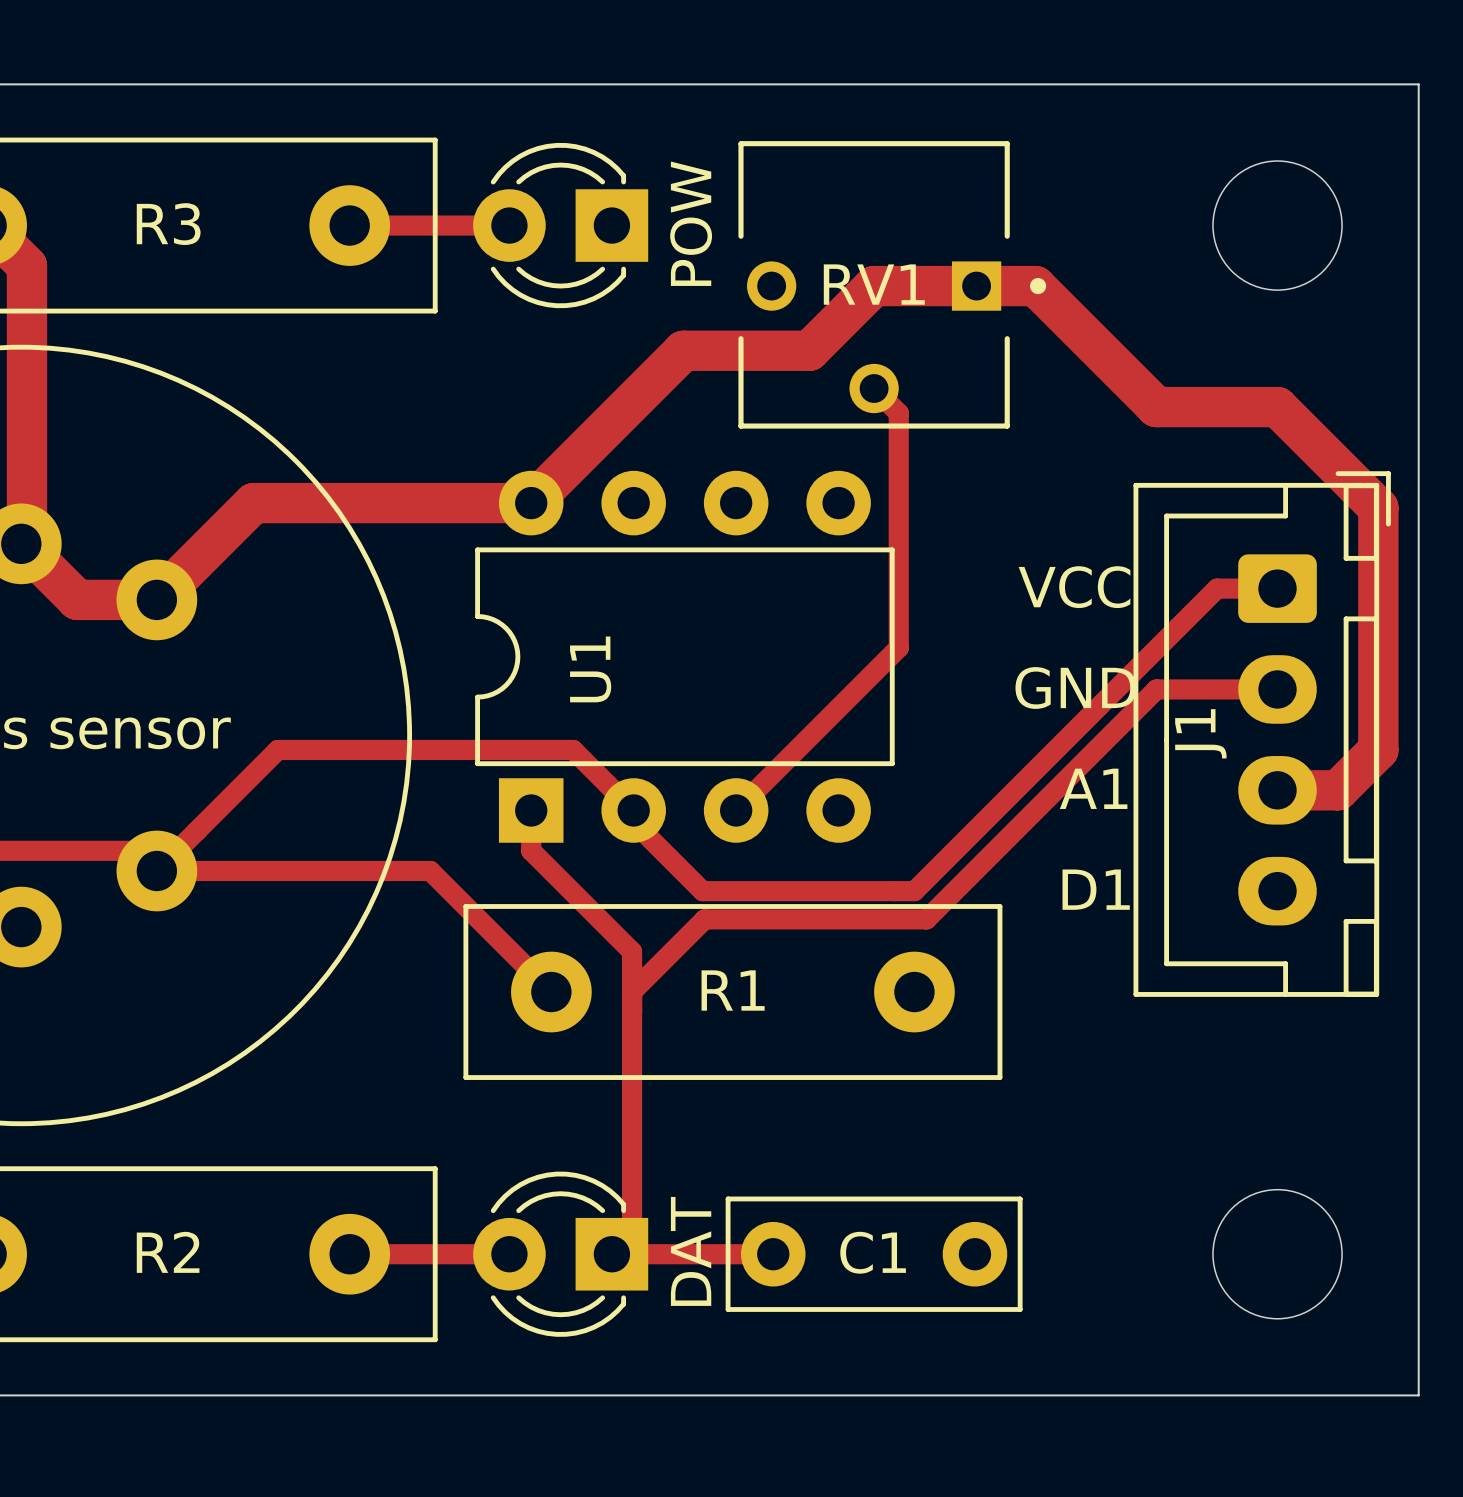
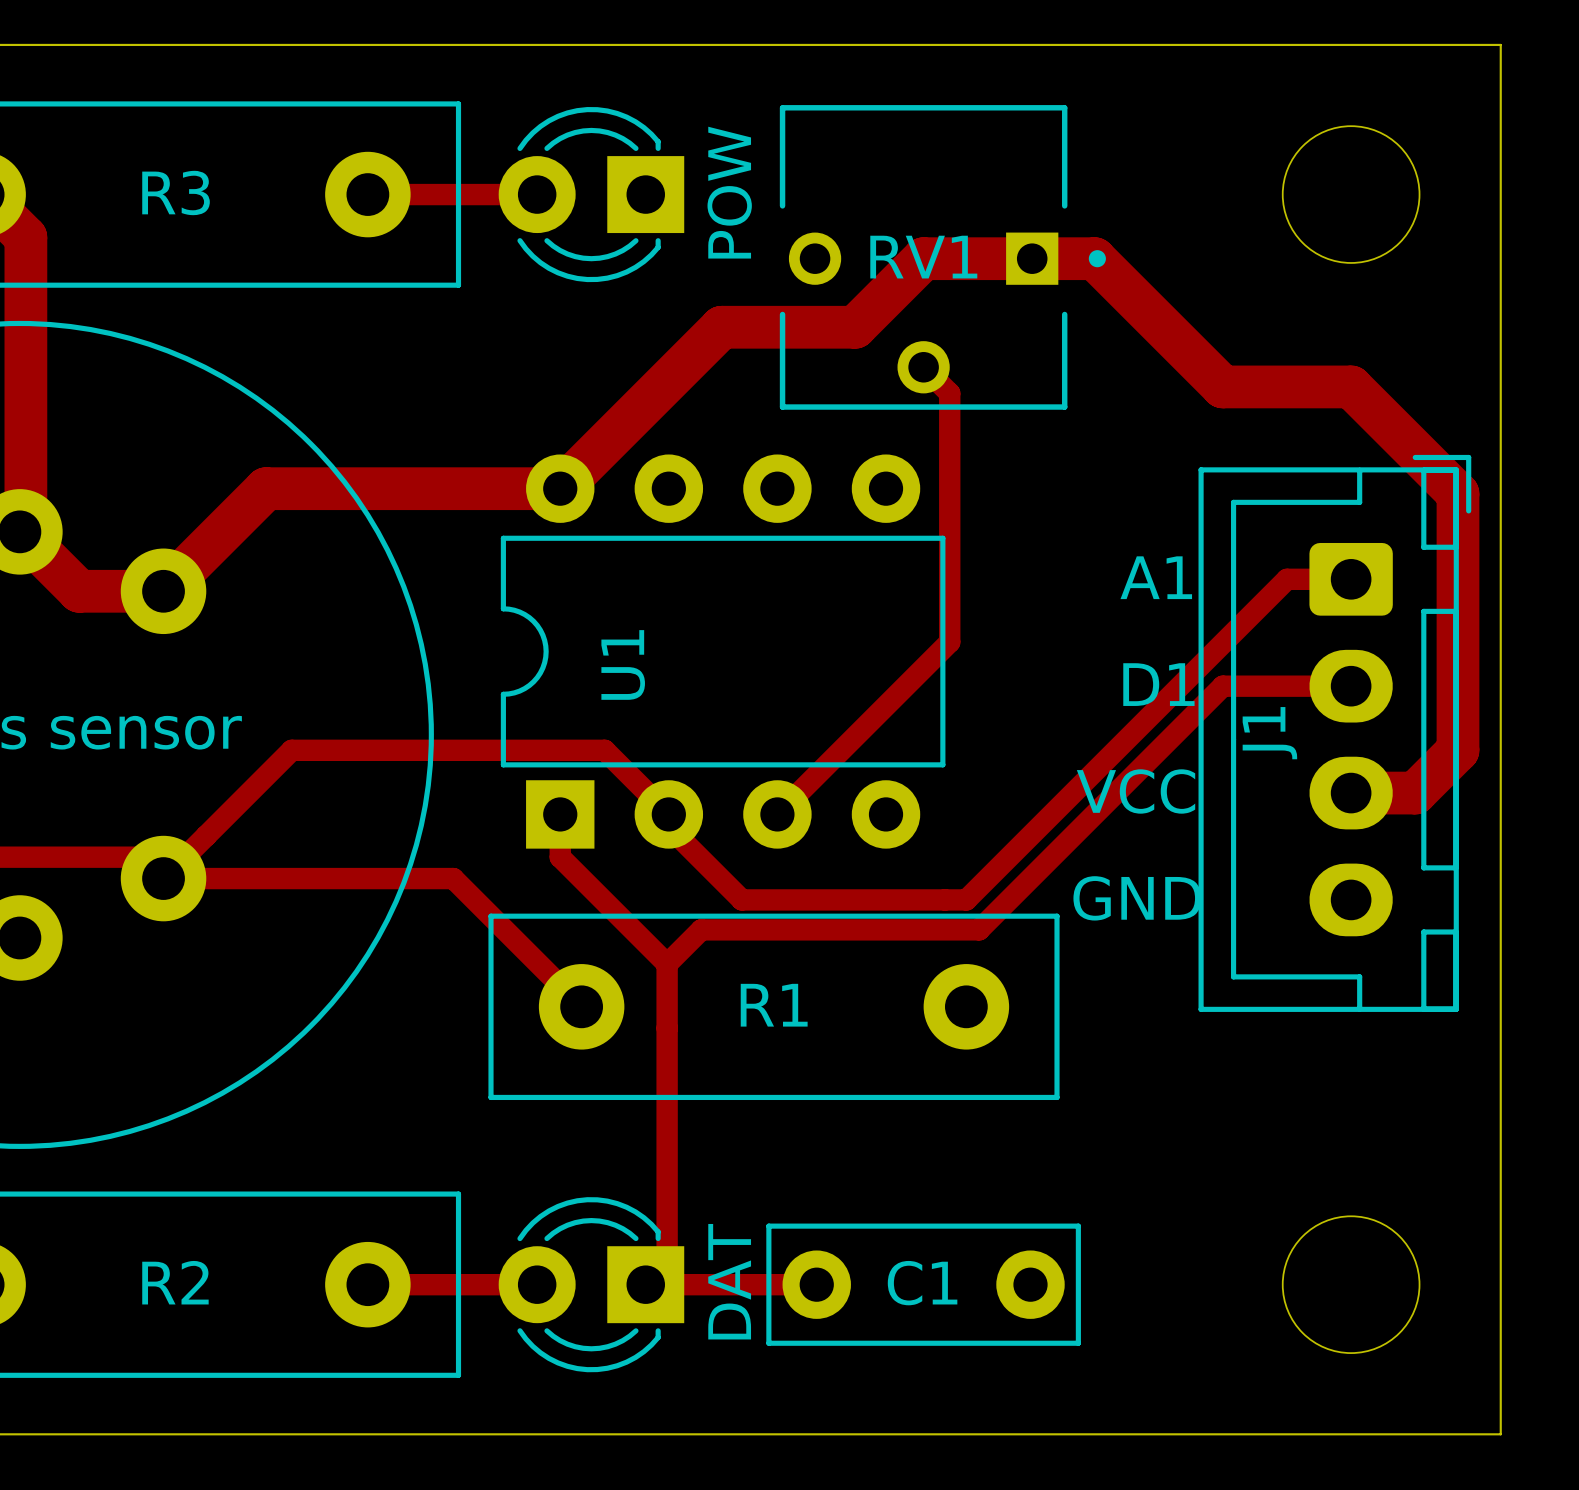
text: VCC (1074, 587) -> A1 (1156, 577)
text: GND (1075, 687) -> D1 (1158, 684)
text: A1 (1093, 788) -> VCC (1136, 791)
text: D1 (1096, 889) -> GND (1137, 898)
track: (704, 919) (632, 992) -> (744, 929) (701, 929) (667, 964)

